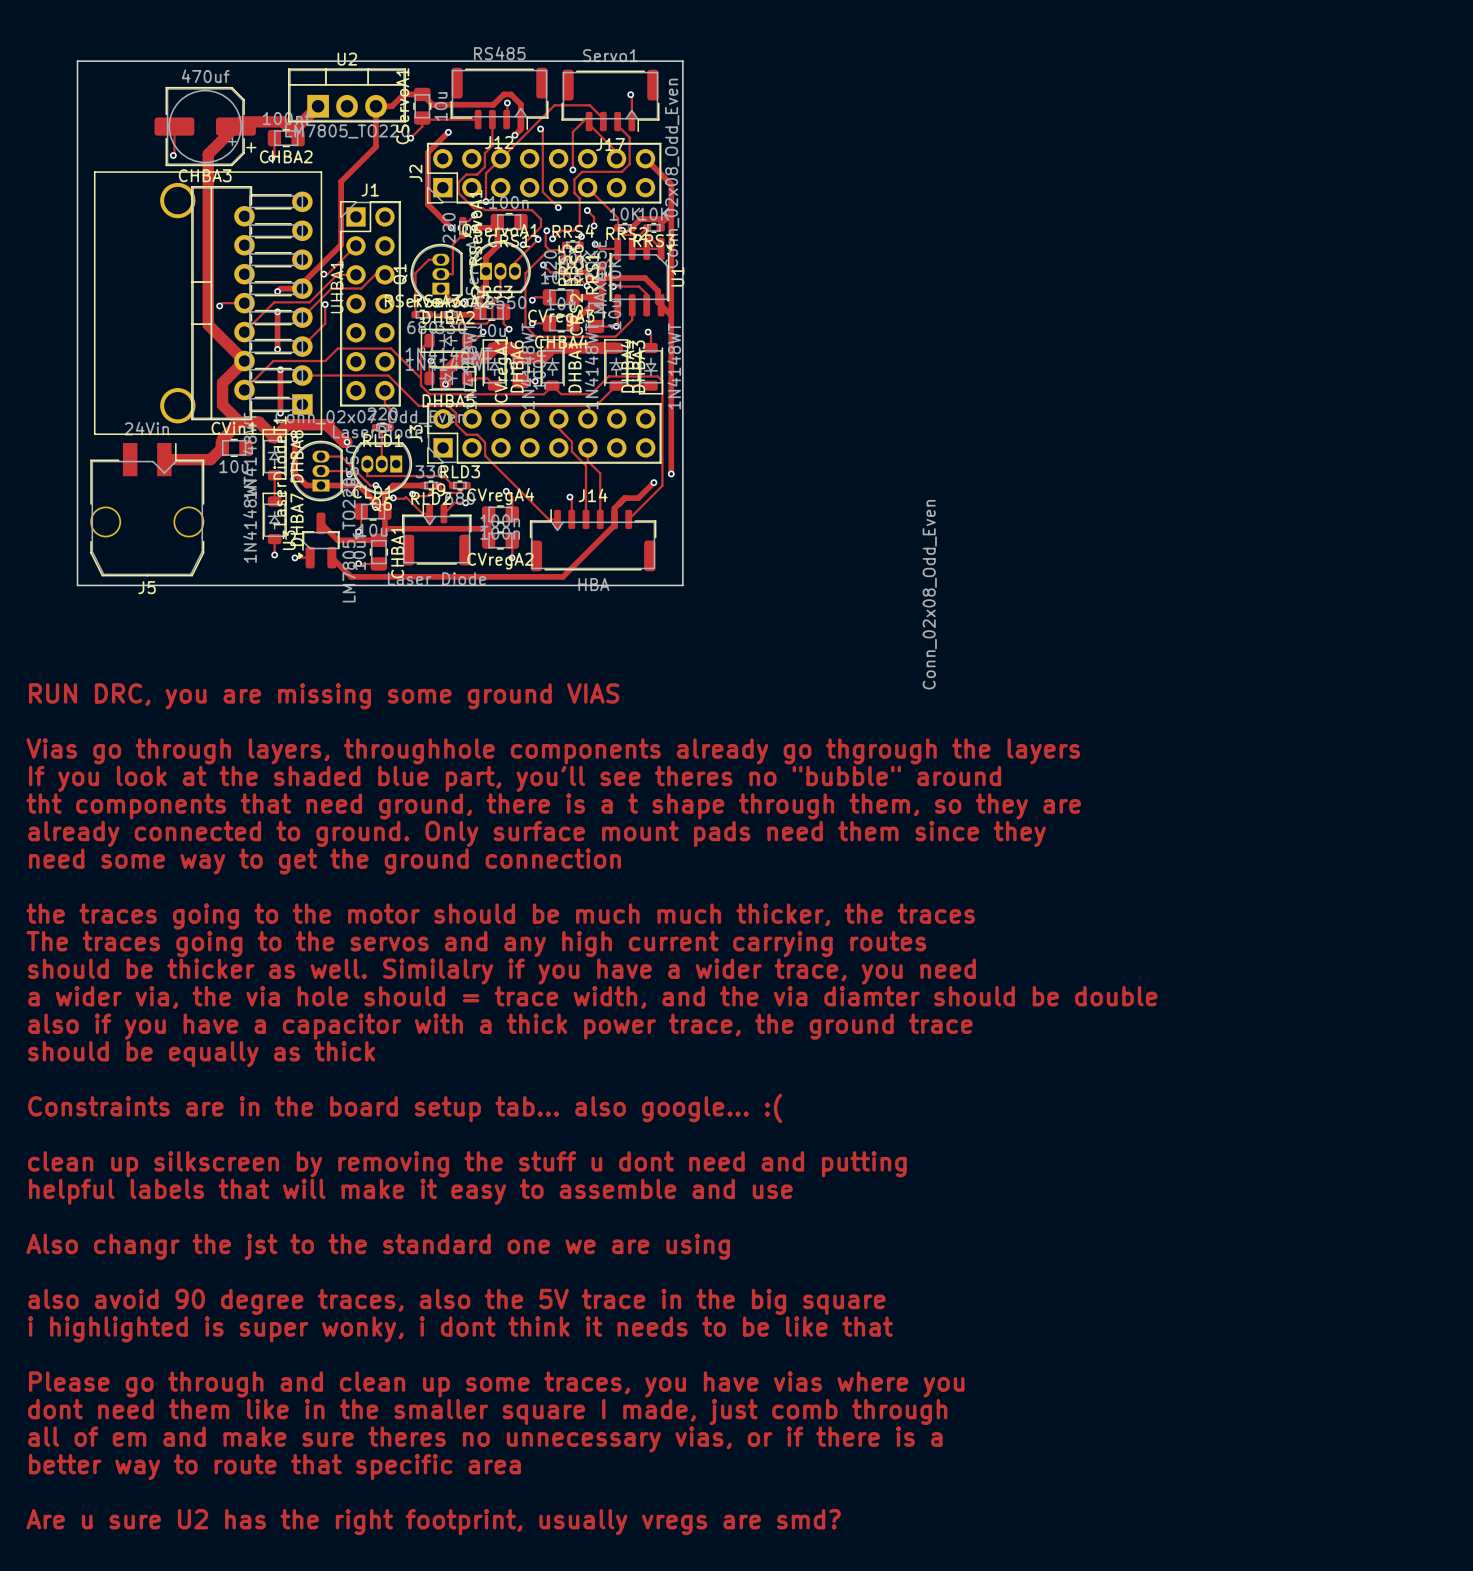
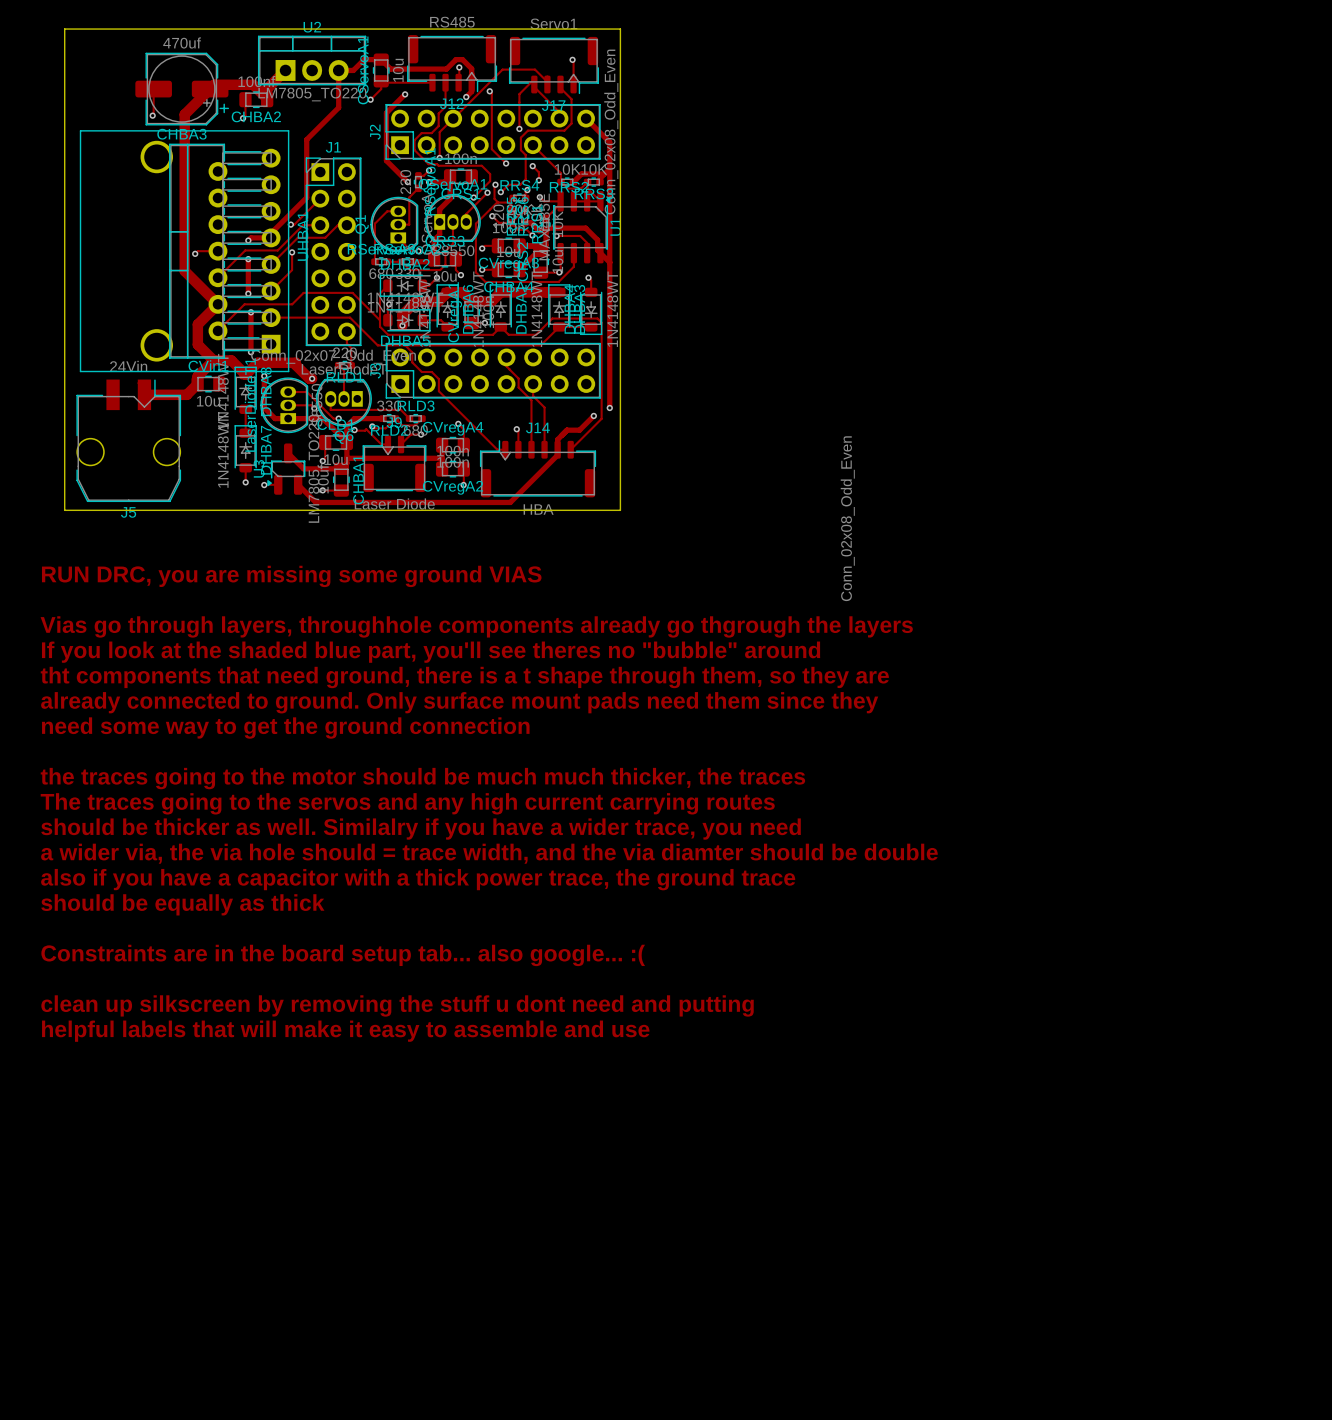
text position: RUN DRC, you are missing some ground VIAS (324, 696) -> RUN DRC, you are missing some ground VIAS (291, 576)
text position: Vias go through layers, throughhole components already go thgrough the layers (553, 751) -> Vias go through layers, throughhole components already go thgrough the layers (476, 626)
text position: If you look at the shaded blue part, you'll see theres no "bubble" around (515, 778) -> If you look at the shaded blue part, you'll see theres no "bubble" around (431, 652)
text position: tht components that need ground, there is a t shape through them, so they are (553, 806) -> tht components that need ground, there is a t shape through them, so they are (464, 677)
text position: already connected to ground. Only surface mount pads need them since they (537, 833) -> already connected to ground. Only surface mount pads need them since they (459, 702)
text position: need some way to get the ground connection (324, 861) -> need some way to get the ground connection (285, 728)
text position: the traces going to the motor should be much much thicker, the traces (500, 916) -> the traces going to the motor should be much much thicker, the traces (422, 778)
text position: The traces going to the servos and any high current carrying routes (476, 944) -> The traces going to the servos and any high current carrying routes (407, 803)
text position: should be thicker as well. Similalry if you have a wider trace, you need (502, 971) -> should be thicker as well. Similalry if you have a wider trace, you need (421, 829)
text position: a wider via, the via hole should = trace width, and the via diamter should be double (592, 997) -> a wider via, the via hole should = trace width, and the via diamter should be double (489, 853)
text position: also if you have a capacitor with a thick power trace, the ground trace (500, 1026) -> also if you have a capacitor with a thick power trace, the ground trace (418, 879)
text position: should be equally as thick (201, 1054) -> should be equally as thick (182, 904)
text position: Constraints are in the board setup tab... also google... :( (405, 1108) -> Constraints are in the board setup tab... also google... :( (343, 955)
text position: clean up silkscreen by removing the stuff u dont need and putting (467, 1164) -> clean up silkscreen by removing the stuff u dont need and putting (397, 1005)
text position: helpful labels that will make it easy to assemble and use (410, 1191) -> helpful labels that will make it easy to assemble and use (345, 1031)
text: Also changr the jst to the standard one we are using (378, 1246) -> none
text: also avoid 90 degree traces, also the 5V trace in the big square (456, 1301) -> none
text: i highlighted is super wonky, i dont think it needs to be like that (460, 1329) -> none
text: Please go through and clean up some traces, you have vias where you (496, 1384) -> none
text: dont need them like in the smaller square I made, just comb through (487, 1411) -> none
text: all of em and make sure theres no unnecessary vias, or if there is a (485, 1439) -> none
text: better way to route that specific area (274, 1467) -> none
text: Are u sure U2 has the right footprint, usually vregs are smd? (433, 1522) -> none

